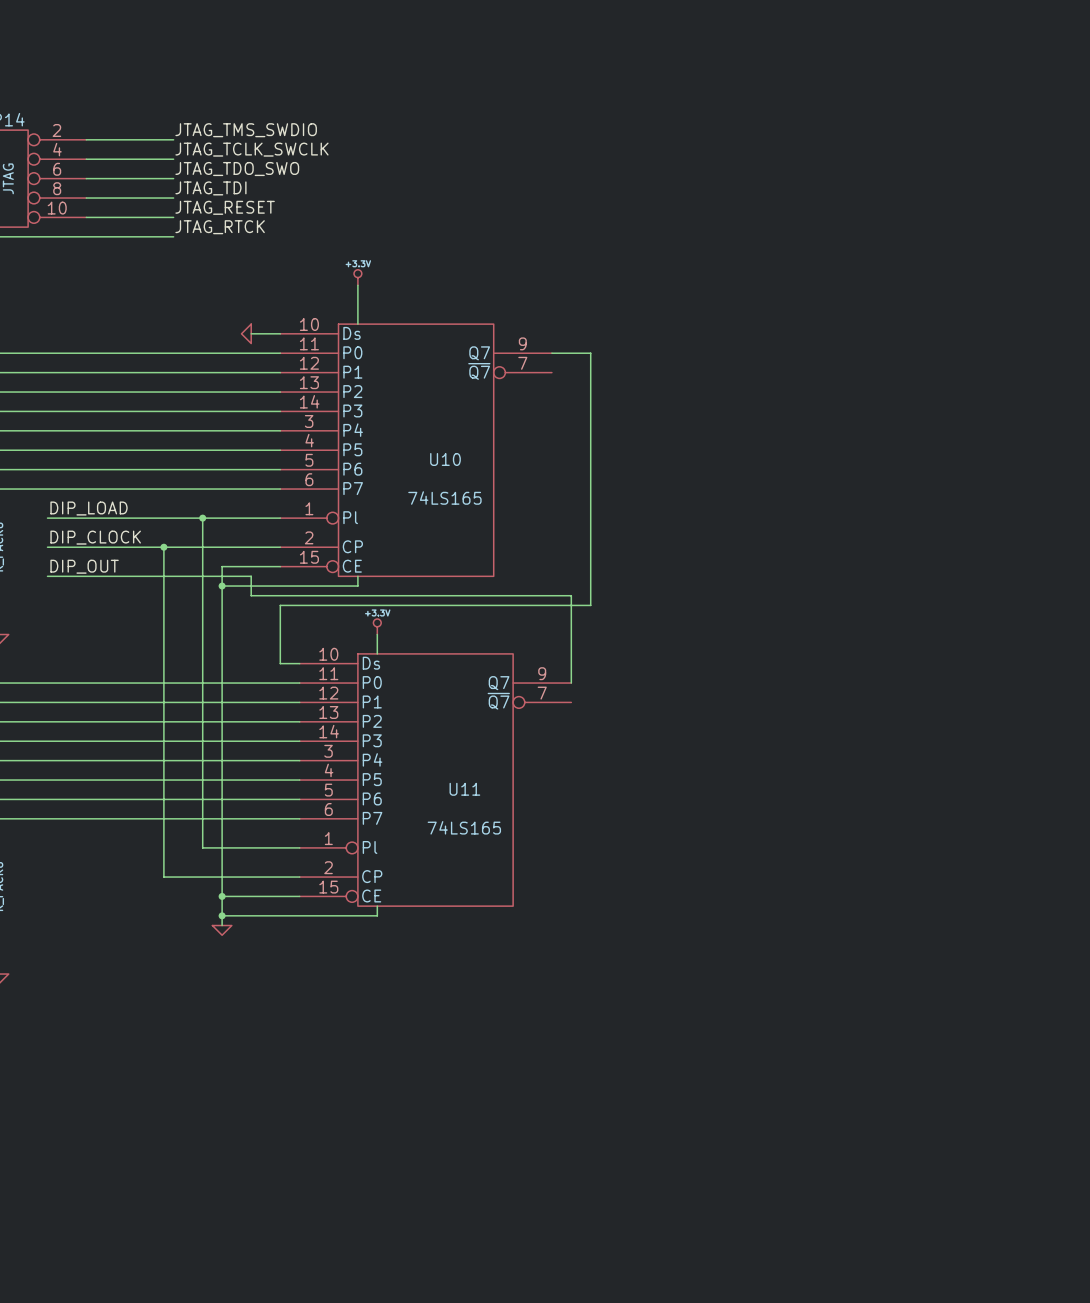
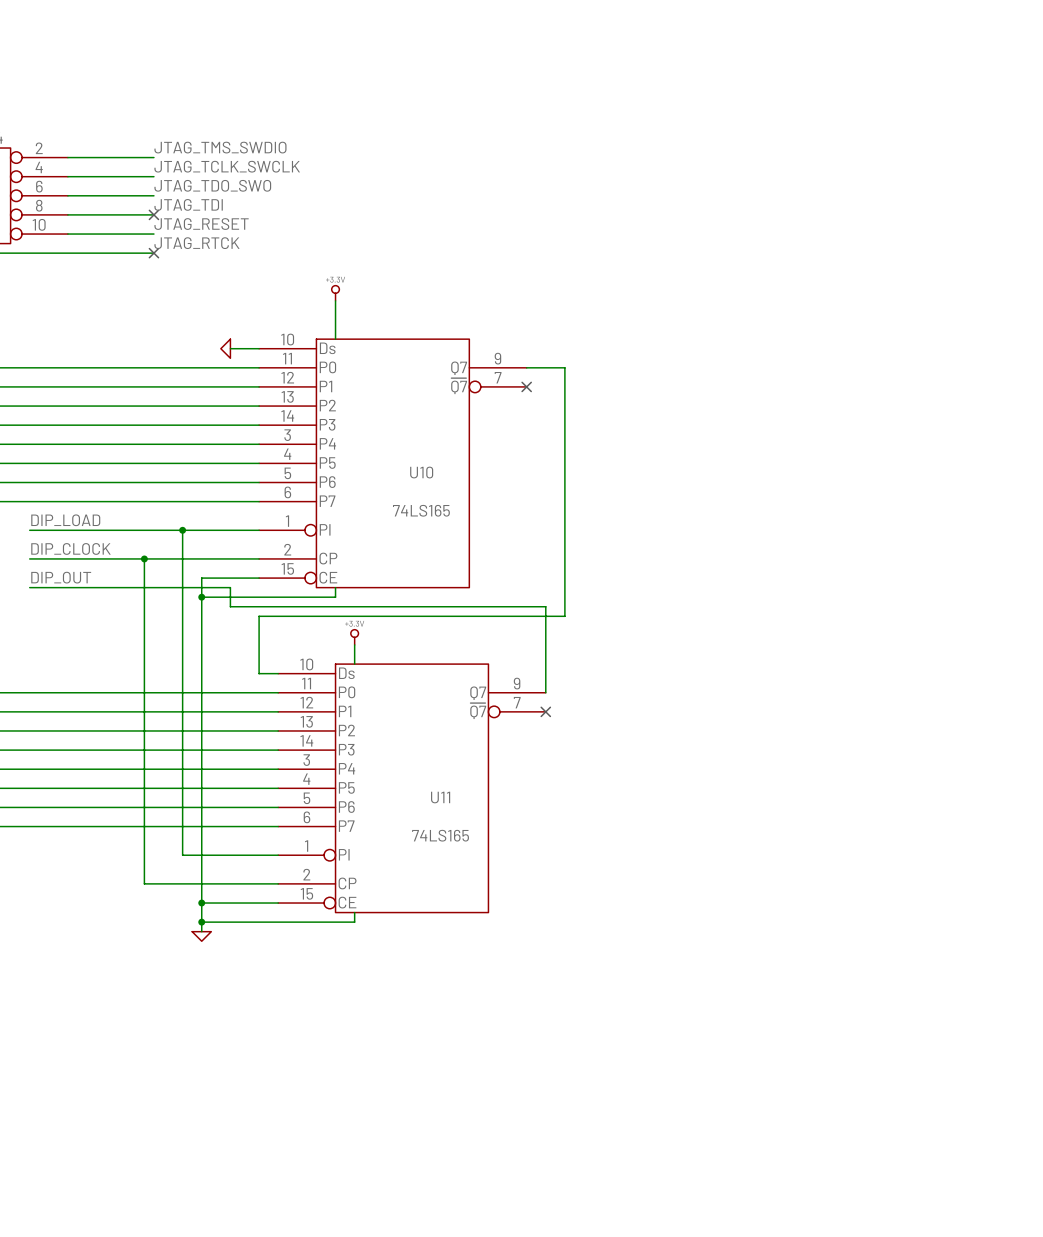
no-connect mark: none -> (153, 214)
no-connect mark: none -> (153, 253)
no-connect mark: none -> (526, 386)
no-connect mark: none -> (545, 711)

